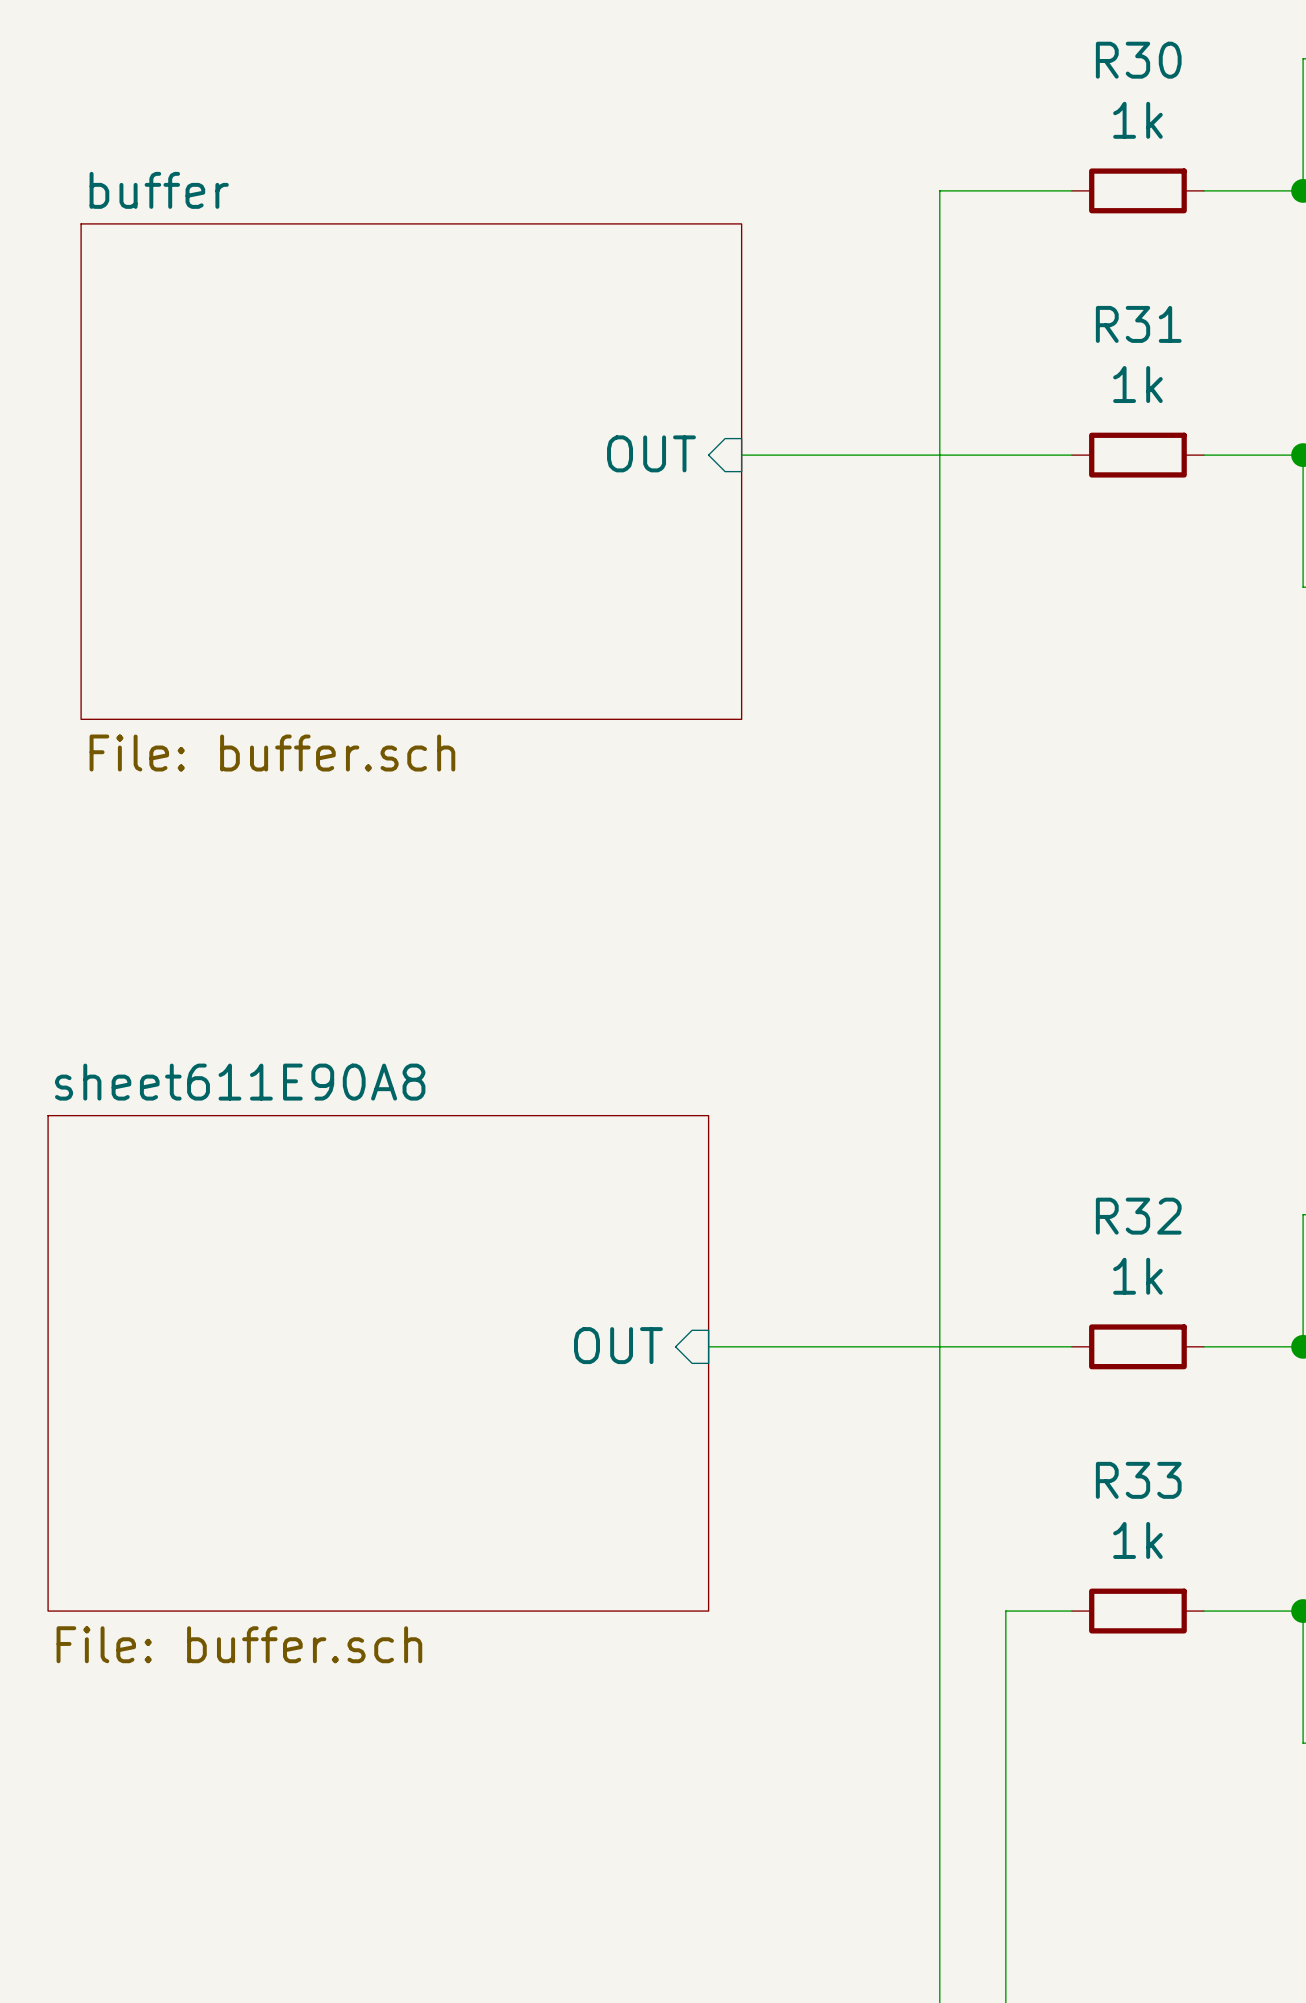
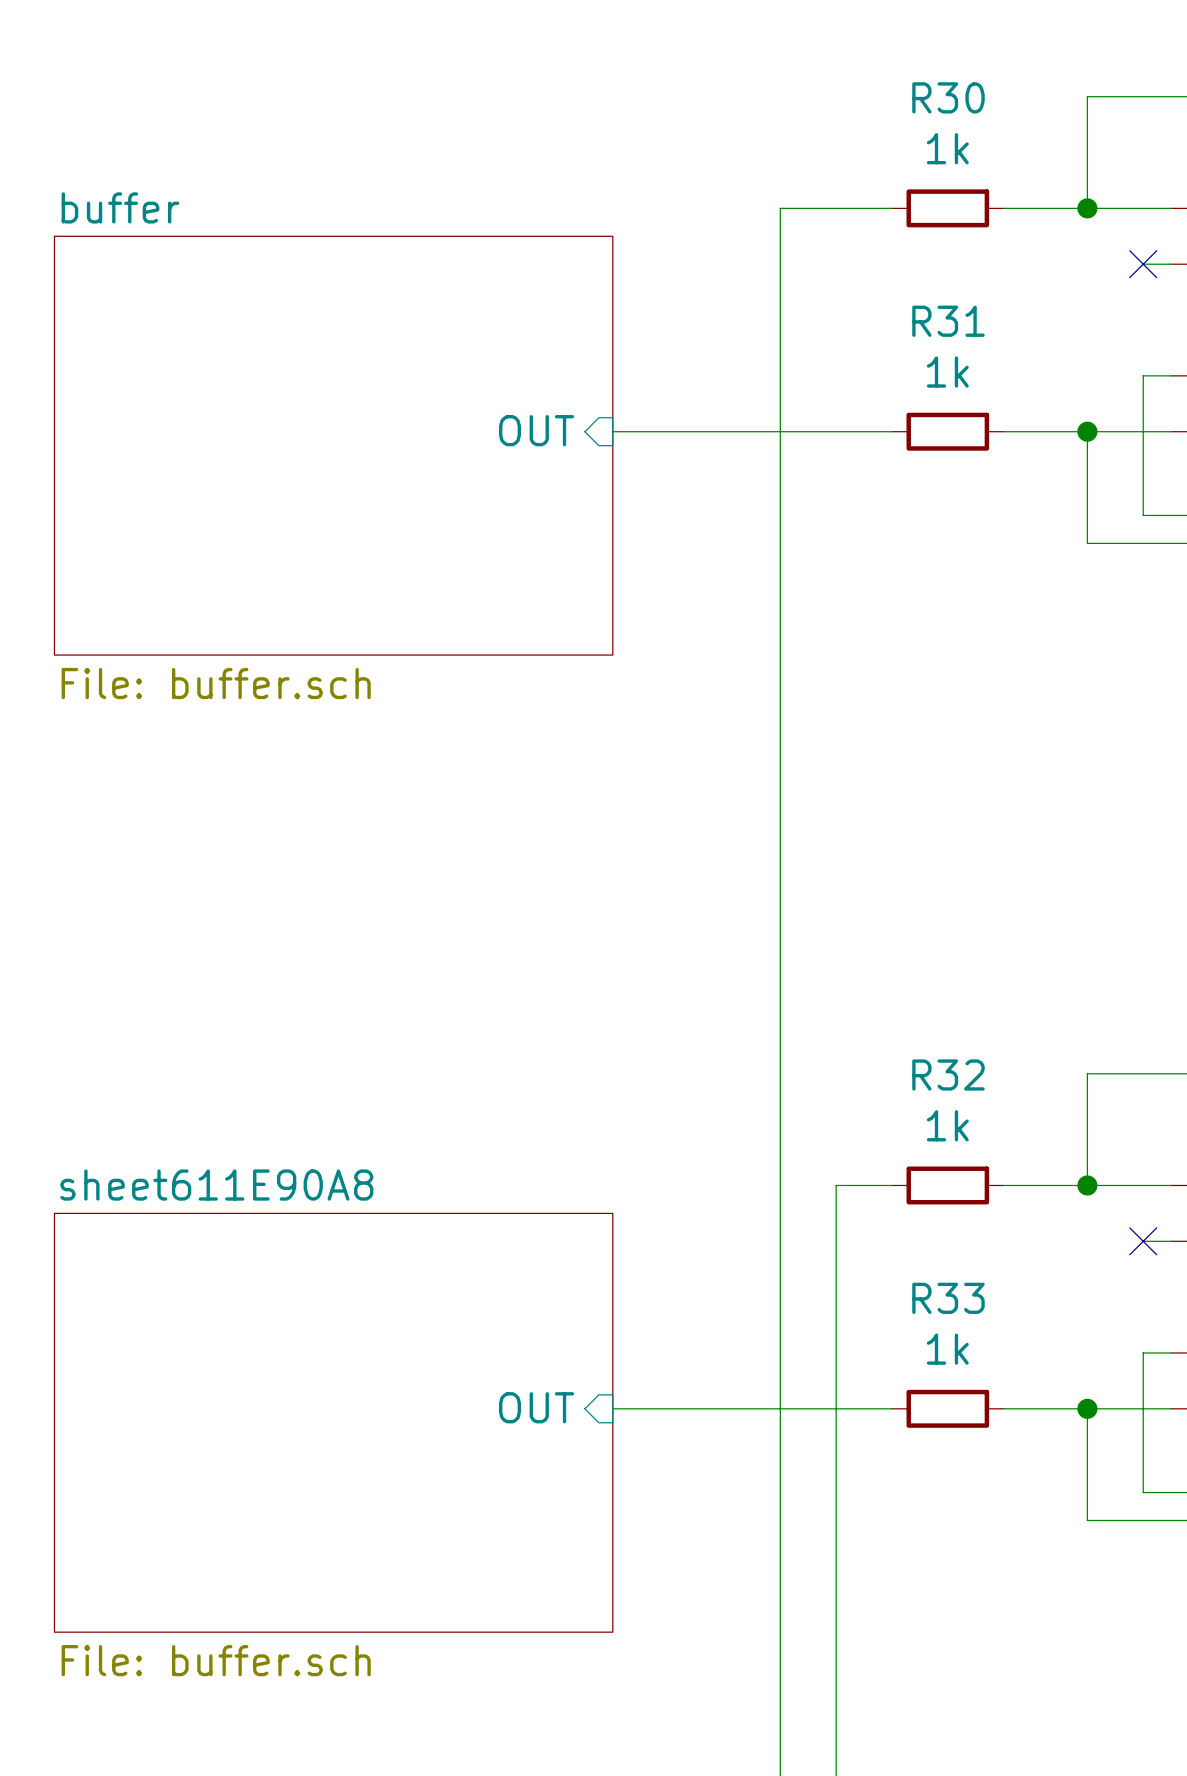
sheet pin position: OUT (618, 1345) -> OUT (536, 1407)
wire: (708, 1346) (1005, 1346) -> (612, 1408) (836, 1408) (836, 1185)
sheet sheet611E90A8 position: (378, 1363) -> (333, 1422)

